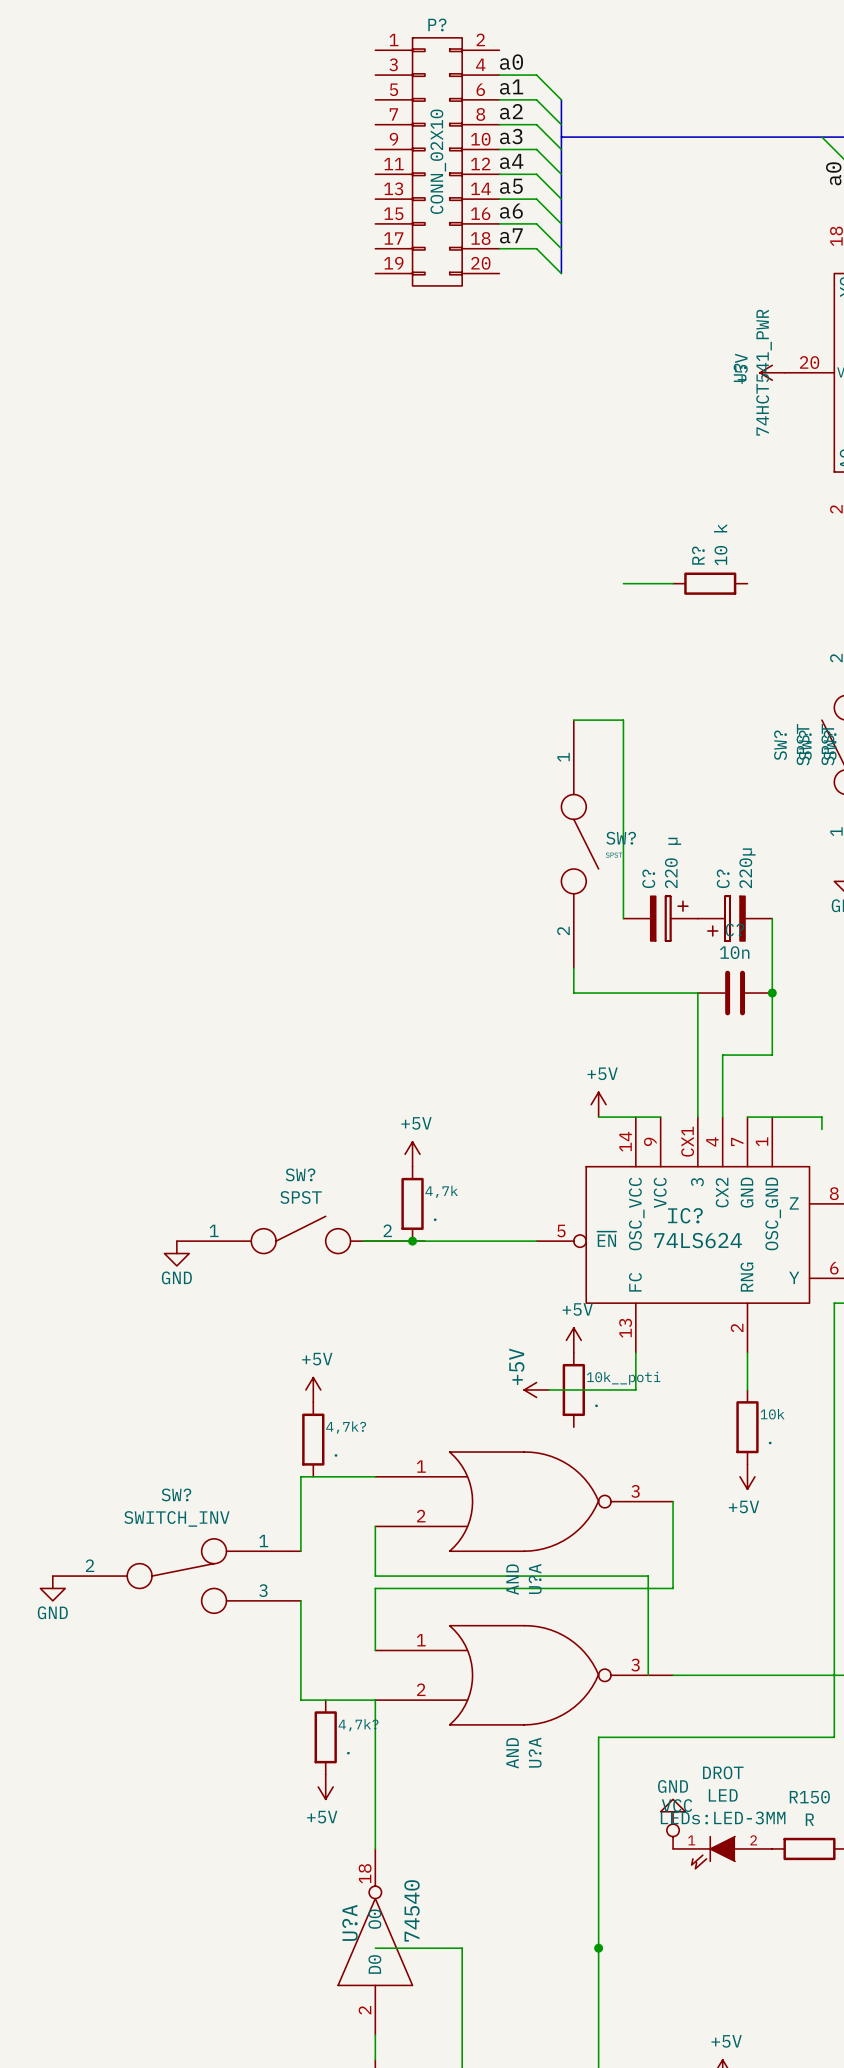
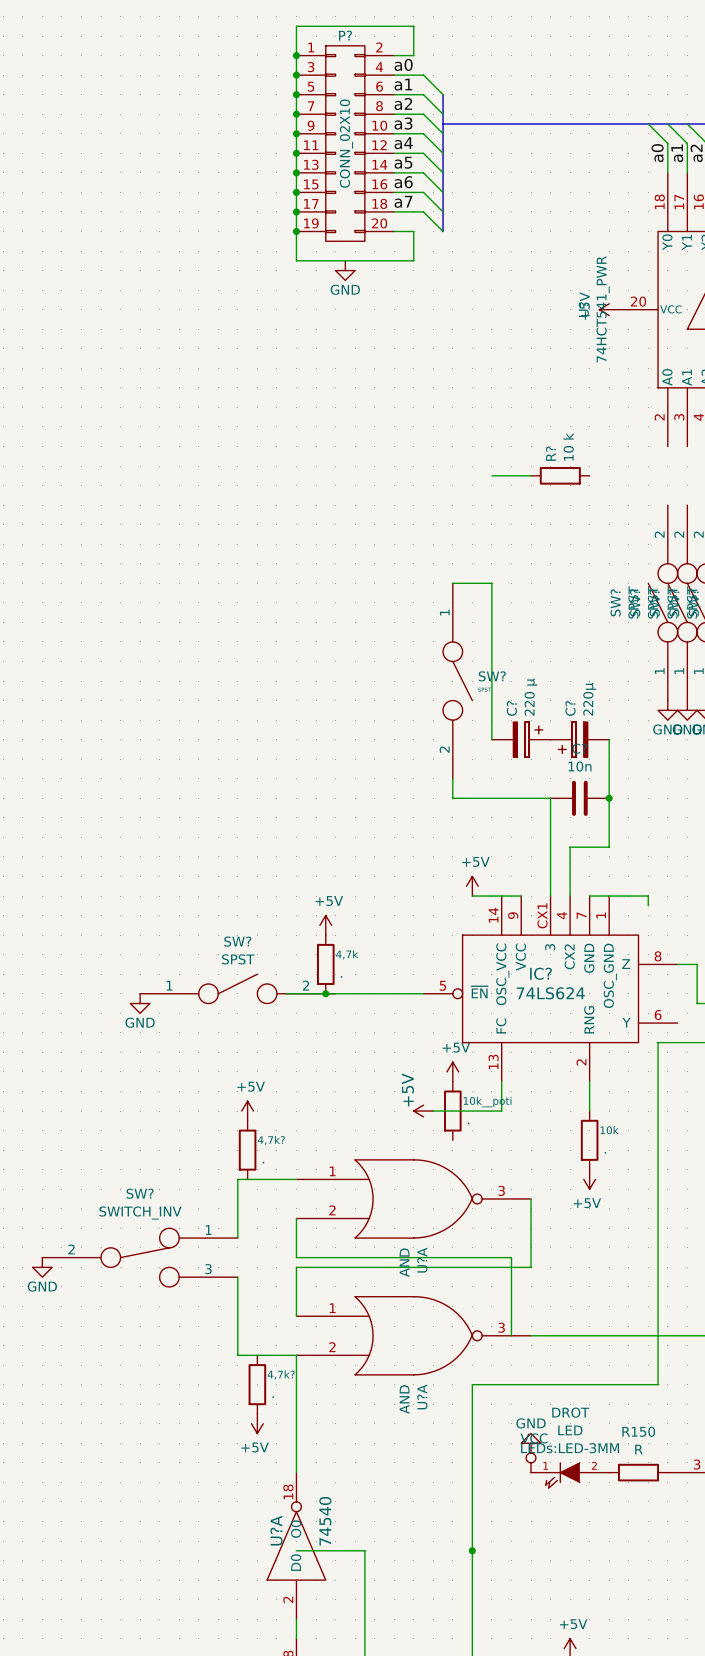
junction: none -> (296, 55)
wire: none -> (394, 55) (413, 55) (413, 26) (296, 26) (296, 260) (413, 260) (413, 231) (394, 231)
junction: none -> (296, 75)
junction: none -> (296, 94)
junction: none -> (296, 114)
junction: none -> (296, 133)
junction: none -> (296, 153)
junction: none -> (296, 172)
junction: none -> (296, 192)
junction: none -> (296, 211)
junction: none -> (296, 231)
power symbol: none -> GND (345, 270)

